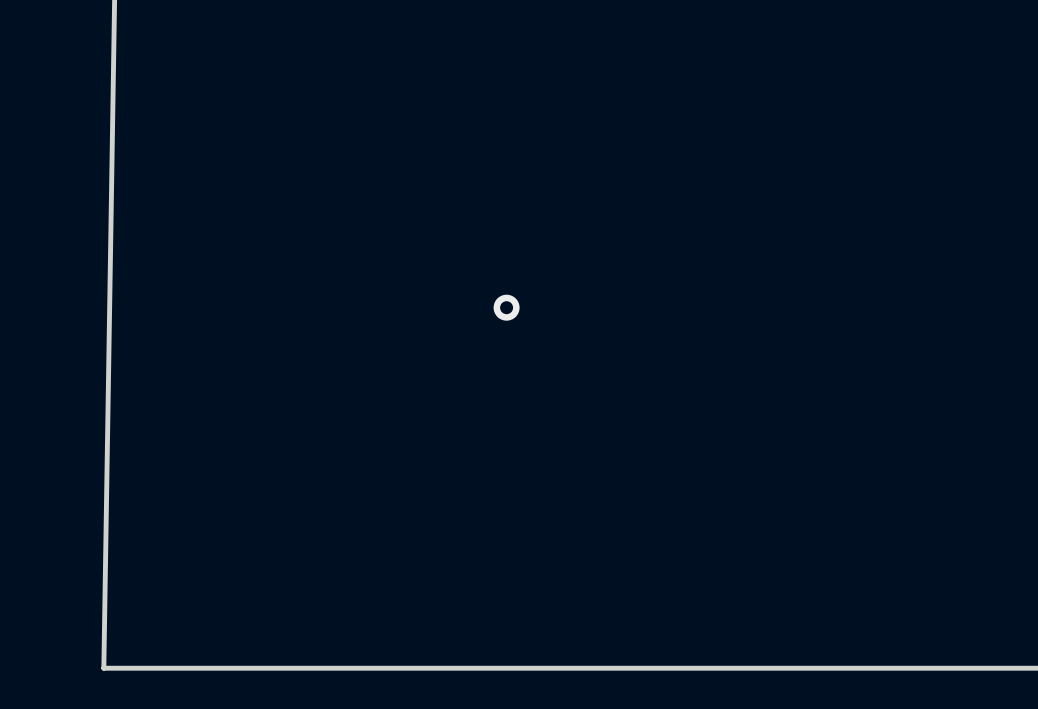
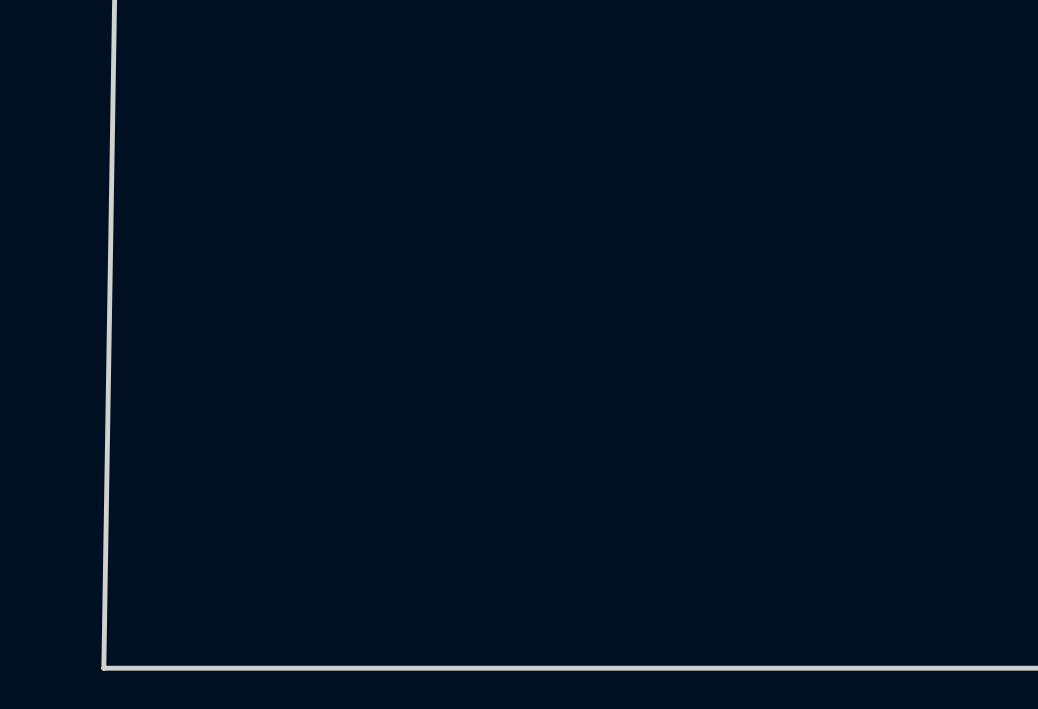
via: (506, 307) -> none

